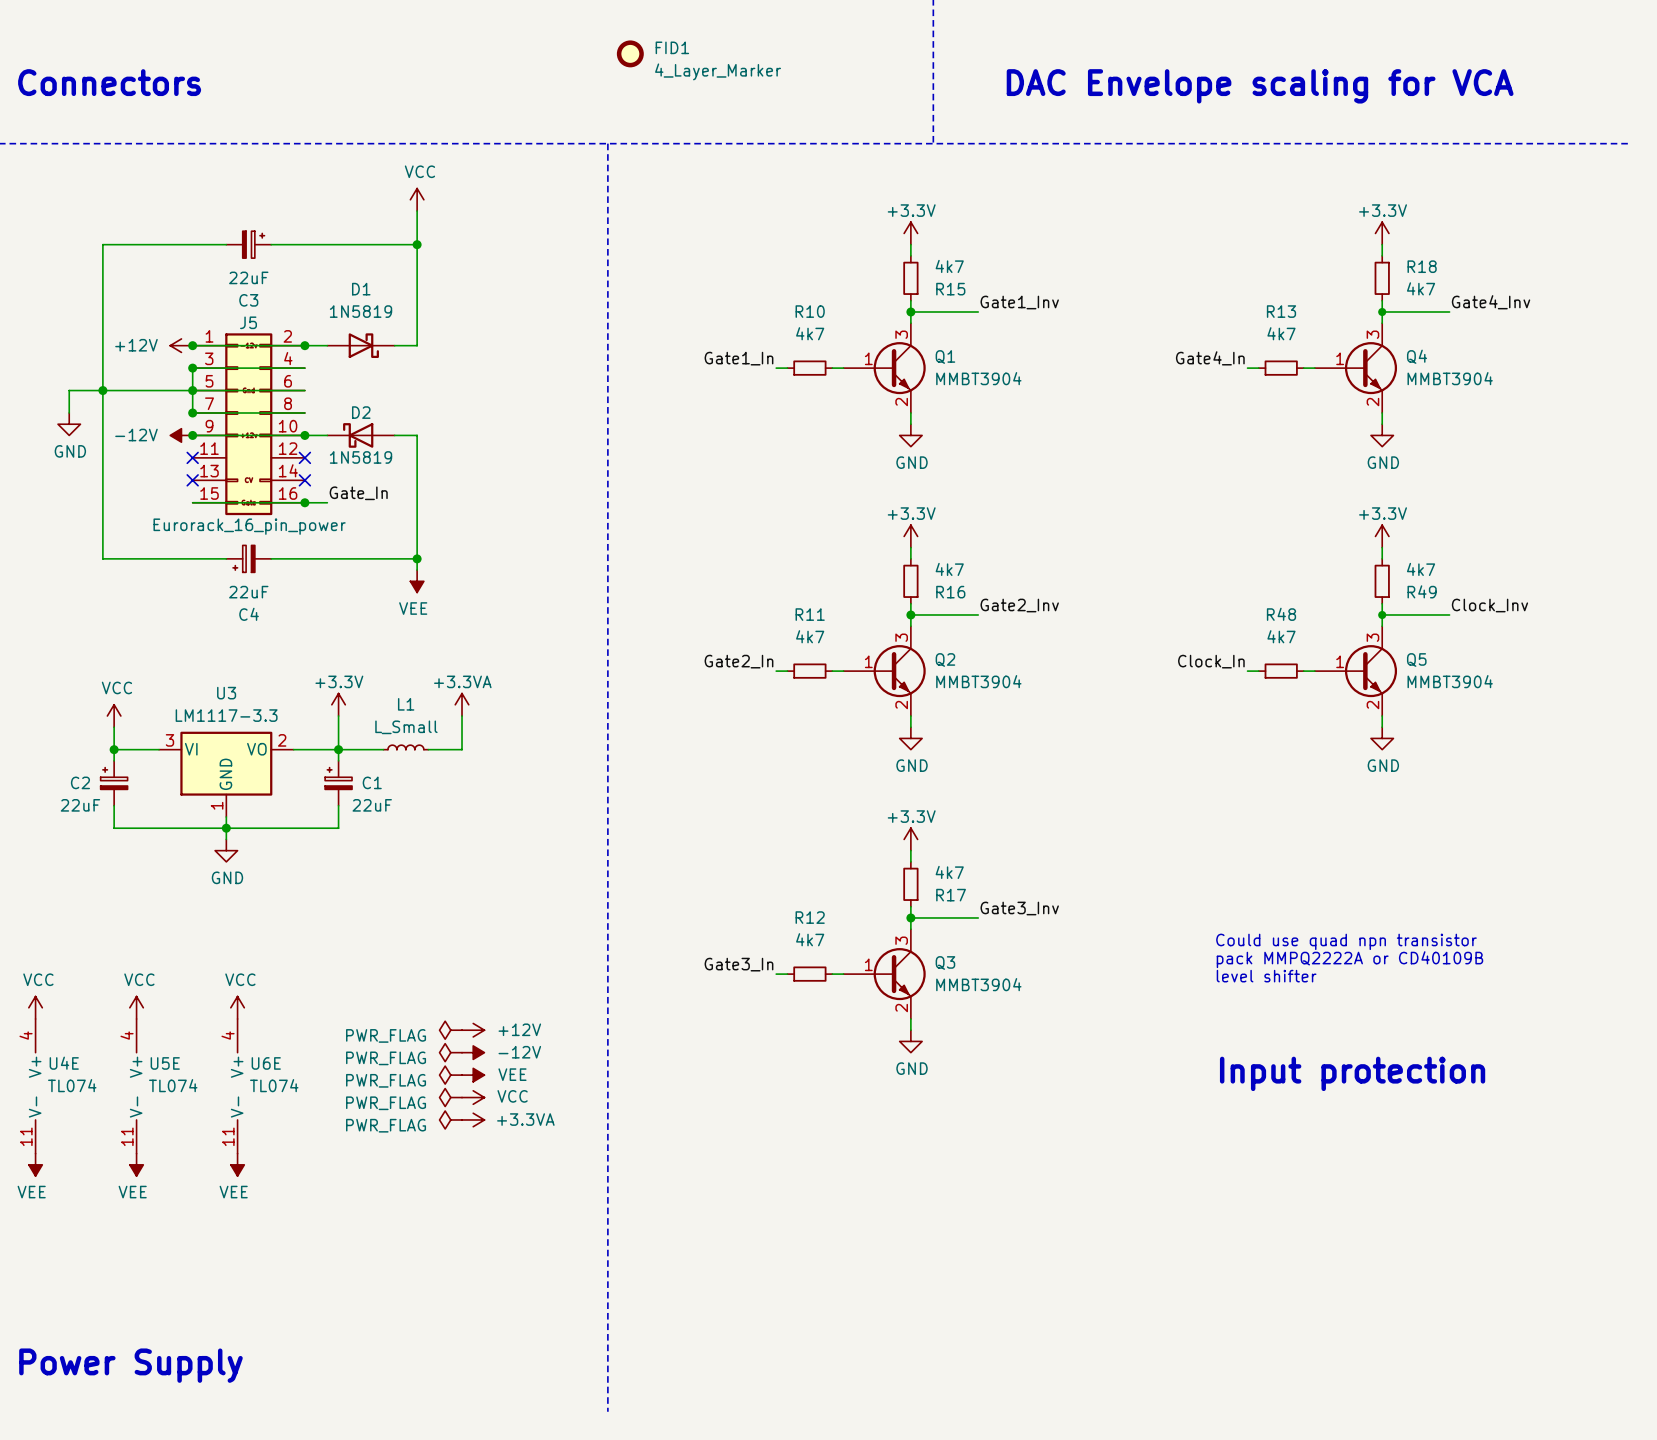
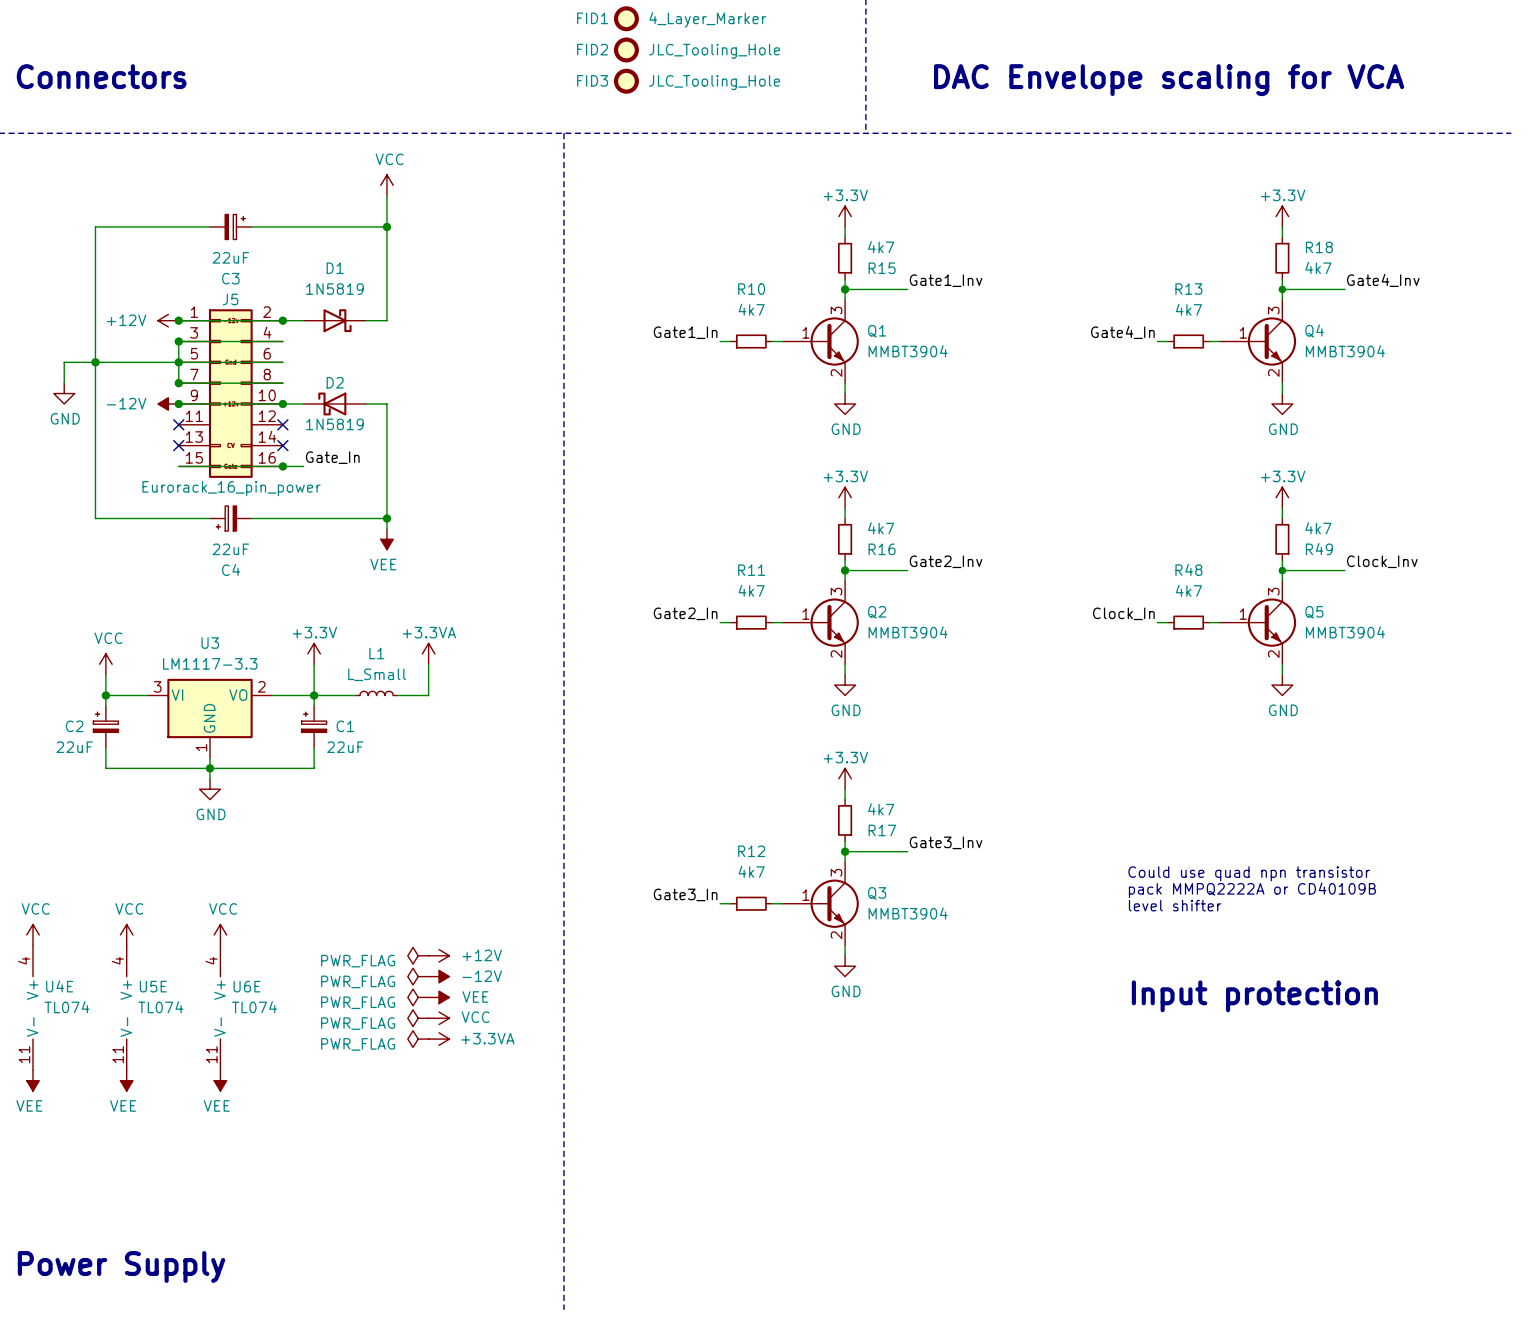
FID1 name position: FID1 (672, 47) -> FID1 (592, 18)
FID1 position: (630, 53) -> (626, 18)
FID2: none -> JLC_Tooling_Hole (626, 49)
FID1 value position: 4_Layer_Marker (718, 71) -> 4_Layer_Marker (707, 19)
FID3: none -> JLC_Tooling_Hole (626, 81)

